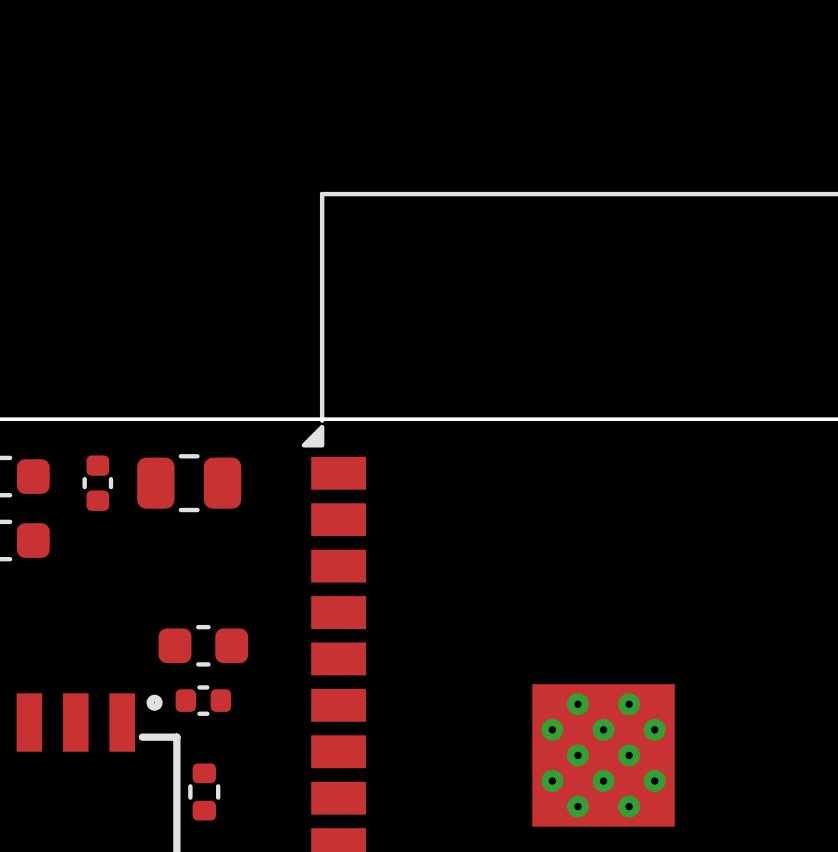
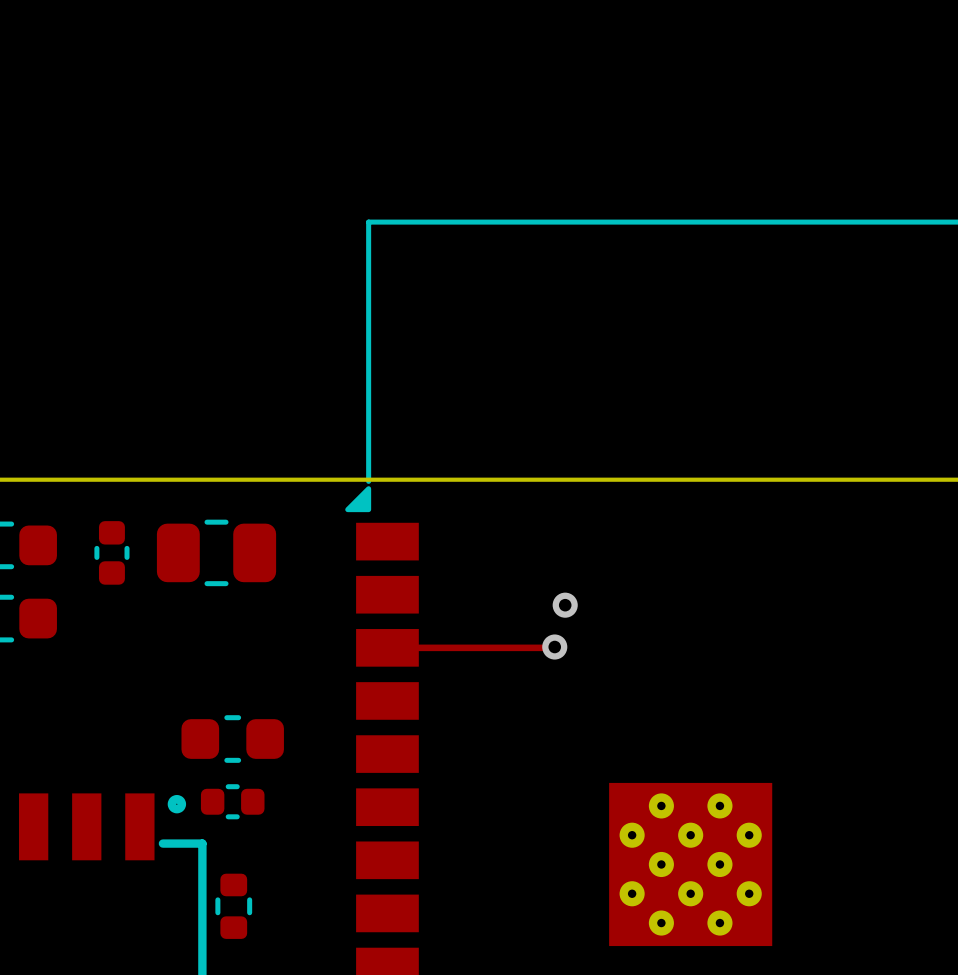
via: none -> (565, 605)
track: none -> (554, 647) (387, 647)
via: none -> (554, 647)

